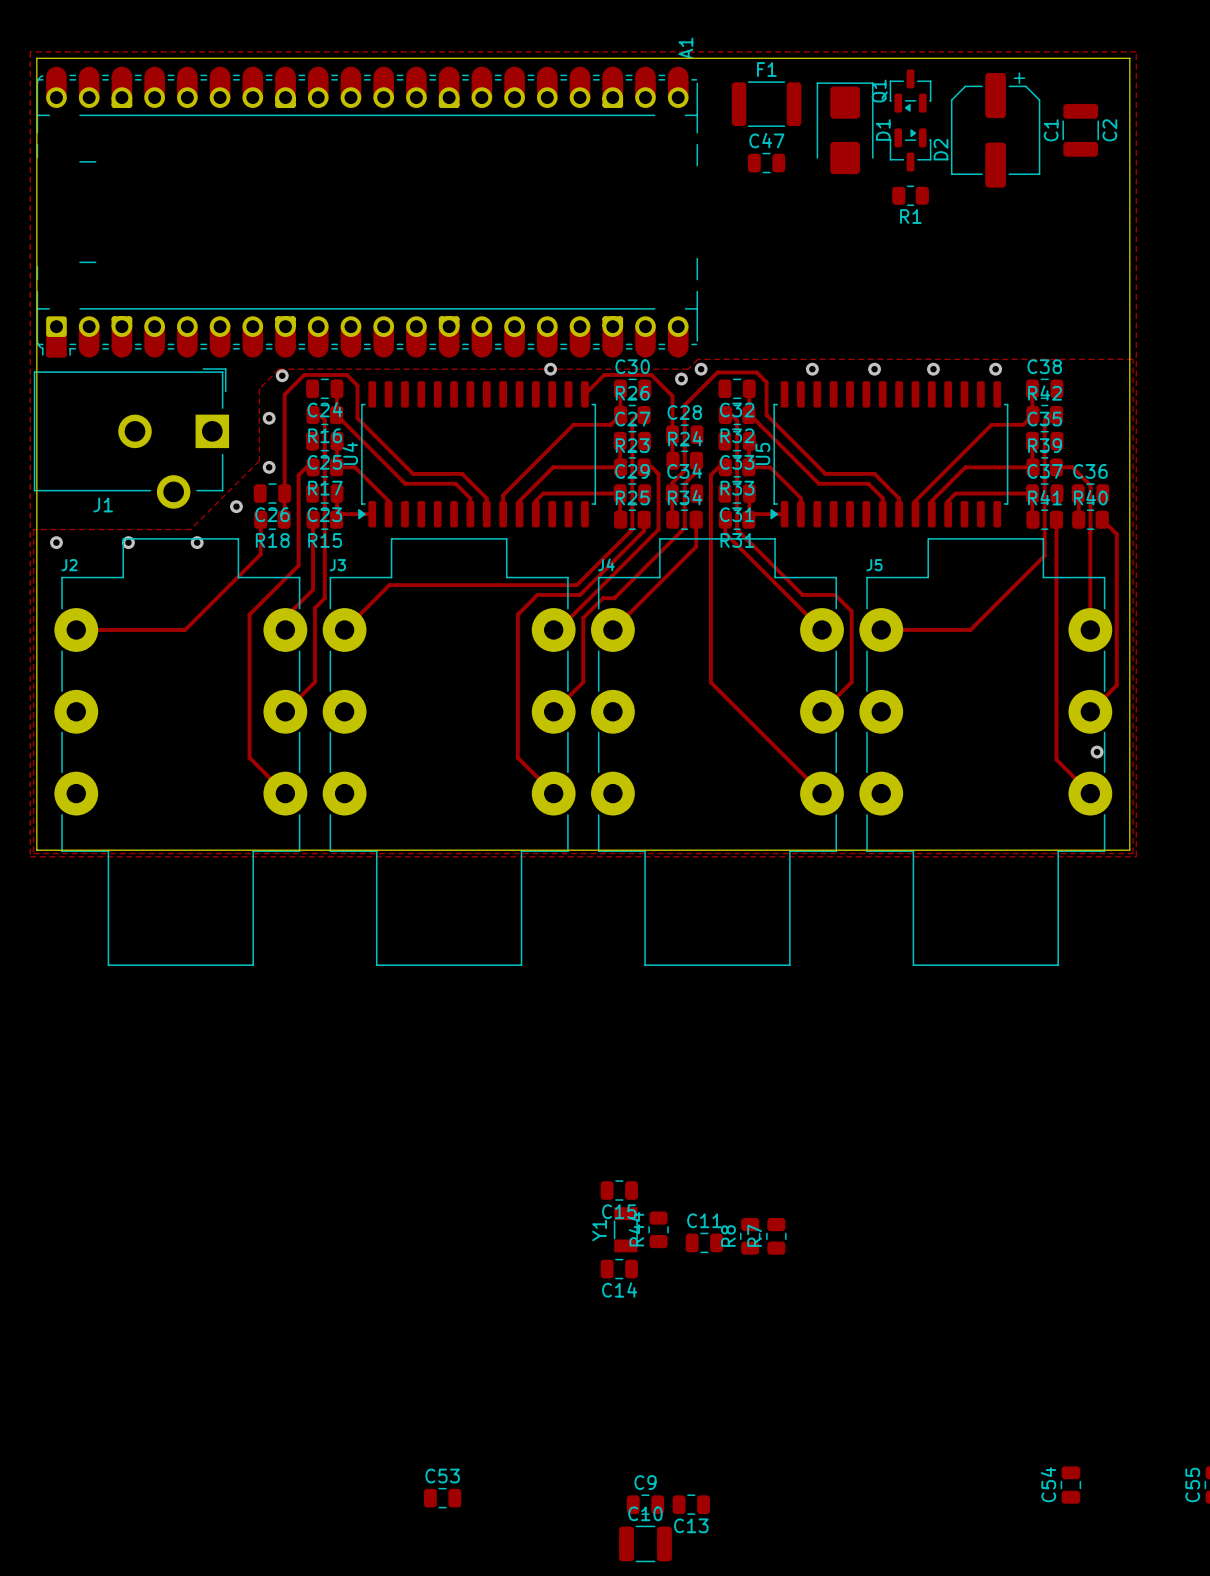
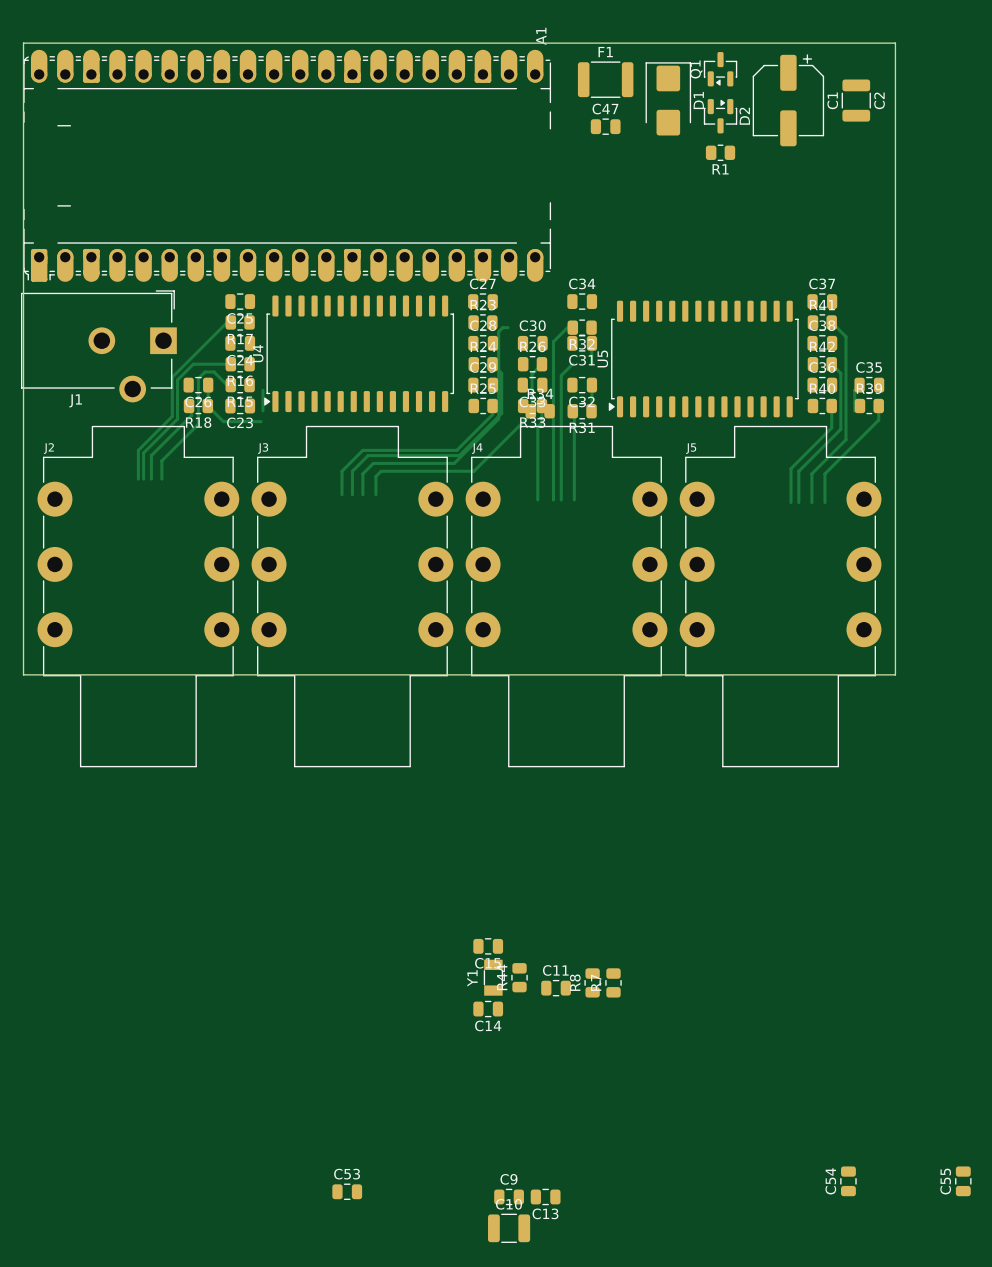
zone outline: (30, 51) (30, 856) (1136, 856) (1136, 51) (30, 51) -> none
zone outline: (697, 359) (1133, 359) (1133, 853) (33, 853) (33, 529) (190, 529) (259, 460) (259, 388) (278, 369) (688, 369) (697, 359) -> none
via: (550, 369) -> none
via: (701, 369) -> none
via: (812, 369) -> none
via: (874, 369) -> none
via: (933, 369) -> none
via: (995, 369) -> none
via: (282, 375) -> none
via: (681, 379) -> none
C24 position: (324, 388) -> (240, 343)
track: (337, 388) (336, 415) (405, 483) (455, 483) (470, 498) (470, 514) -> none
track: (620, 388) (620, 415) (610, 424) (573, 424) (503, 495) (503, 514) -> none
C30 position: (632, 388) -> (532, 343)
C32 position: (737, 388) -> (582, 385)
track: (749, 388) (748, 415) (818, 483) (868, 483) (882, 498) (882, 514) -> none
track: (1032, 388) (1032, 415) (1023, 424) (991, 424) (915, 500) (915, 514) -> none
C38 position: (1044, 388) -> (822, 343)
track: (584, 394) (604, 374) (651, 374) (672, 396) (672, 460) -> none
track: none -> (230, 322) (227, 322) (172, 377) (172, 416) (138, 450) (138, 479)
track: (725, 408) (737, 420) (737, 529) (802, 594) (835, 594) (851, 611) (851, 682) (822, 711) -> (572, 322) (553, 341) (553, 499)
track: none -> (831, 322) (845, 336) (845, 439) (811, 473) (811, 502)
track: (313, 415) (319, 415) (324, 420) (324, 598) (314, 608) (314, 682) (285, 711) -> none
R16 position: (324, 415) -> (240, 364)
R26 position: (632, 415) -> (532, 364)
R42 position: (1044, 415) -> (822, 364)
track: (1056, 415) (1049, 415) (1044, 420) (1044, 555) (970, 629) (881, 629) -> none
via: (269, 418) -> none
C28 position: (684, 434) -> (483, 343)
C25 position: (324, 441) -> (240, 301)
track: (337, 441) (336, 467) (355, 467) (388, 500) (388, 514) -> none
track: (620, 441) (620, 467) (553, 467) (519, 500) (519, 514) -> none
C27 position: (632, 441) -> (482, 301)
C33 position: (737, 441) -> (532, 385)
track: (1032, 441) (1032, 467) (965, 467) (931, 500) (931, 514) -> none
C35 position: (1044, 441) -> (869, 385)
U4 position: (477, 454) -> (359, 353)
track: none -> (230, 364) (193, 364) (177, 379) (177, 419) (143, 452) (143, 479)
track: none -> (492, 364) (501, 373) (501, 413) (459, 455) (368, 455) (352, 471) (352, 494)
R24 position: (684, 460) -> (483, 364)
track: (696, 460) (696, 471) (684, 483) (684, 527) (614, 598) (602, 598) (583, 617) (583, 682) (553, 711) -> none
track: none -> (831, 364) (840, 373) (840, 429) (798, 471) (798, 502)
via: (269, 467) -> none
track: (313, 467) (306, 467) (298, 475) (298, 565) (249, 614) (249, 757) (285, 793) -> none
R17 position: (324, 467) -> (240, 322)
R23 position: (632, 467) -> (482, 322)
track: (644, 467) (652, 467) (658, 473) (658, 529) (558, 629) (553, 629) -> none
R33 position: (737, 467) -> (532, 405)
track: (748, 467) (770, 467) (800, 498) (800, 514) -> none
R39 position: (1044, 467) -> (869, 405)
track: (1056, 467) (1072, 467) (1090, 485) (1090, 532) -> none
track: none -> (208, 385) (207, 405) (223, 421) (261, 421)
track: none -> (230, 385) (227, 385) (214, 372) (204, 372) (198, 378) (198, 424) (161, 460) (161, 479)
C26 position: (272, 493) -> (198, 385)
C23 position: (324, 493) -> (240, 405)
C29 position: (632, 493) -> (483, 385)
C34 position: (684, 493) -> (582, 301)
C31 position: (737, 493) -> (582, 343)
C37 position: (1044, 493) -> (822, 301)
C36 position: (1090, 493) -> (822, 385)
via: (236, 506) -> none
track: none -> (191, 405) (191, 415) (151, 455) (151, 479)
track: none -> (492, 405) (492, 414) (456, 450) (362, 450) (342, 471) (342, 494)
track: none -> (541, 405) (541, 422) (537, 426) (537, 499)
track: none -> (572, 405) (574, 407) (574, 499)
track: none -> (831, 405) (831, 427) (791, 468) (791, 502)
track: none -> (878, 405) (878, 420) (824, 473) (824, 502)
track: (372, 514) (342, 514) (336, 519) -> none
track: (486, 514) (486, 498) (462, 473) (413, 473) (357, 418) (357, 385) (346, 374) (304, 374) (284, 394) (284, 519) -> none
track: (535, 514) (535, 500) (543, 493) (620, 493) (620, 519) -> none
track: (784, 514) (754, 514) (748, 519) -> none
track: (899, 514) (899, 498) (874, 473) (825, 473) (766, 415) (766, 382) (756, 372) (717, 372) (684, 405) (684, 470) (672, 483) (672, 519) -> none
track: (948, 514) (948, 500) (955, 493) (1032, 493) (1032, 519) -> none
track: (260, 519) (260, 554) (185, 629) (76, 629) -> none
R18 position: (272, 519) -> (198, 405)
track: (313, 519) (313, 589) (285, 617) (285, 629) -> none
R15 position: (324, 519) -> (240, 385)
R25 position: (632, 519) -> (483, 405)
track: (644, 519) (644, 530) (580, 594) -> (541, 364) (532, 374) (532, 413) (474, 471) (456, 471)
track: (696, 519) (696, 546) (612, 629) -> none
track: (725, 519) (725, 533) (822, 629) -> none
R41 position: (1044, 519) -> (822, 322)
track: (1056, 519) (1056, 759) (1090, 793) -> none
R40 position: (1090, 519) -> (822, 405)
track: (1102, 519) (1116, 534) (1116, 685) (1090, 711) -> none
track: (1090, 532) (1090, 629) -> none
via: (56, 542) -> none
via: (128, 542) -> none
via: (197, 542) -> none
track: (475, 585) (389, 585) (344, 629) -> (373, 463) (362, 473) (362, 494)
track: (537, 594) (517, 614) (517, 757) (553, 793) -> (422, 471) (381, 471) (375, 476) (375, 494)
track: (710, 630) (710, 682) (822, 793) -> none
via: (1097, 752) -> none

